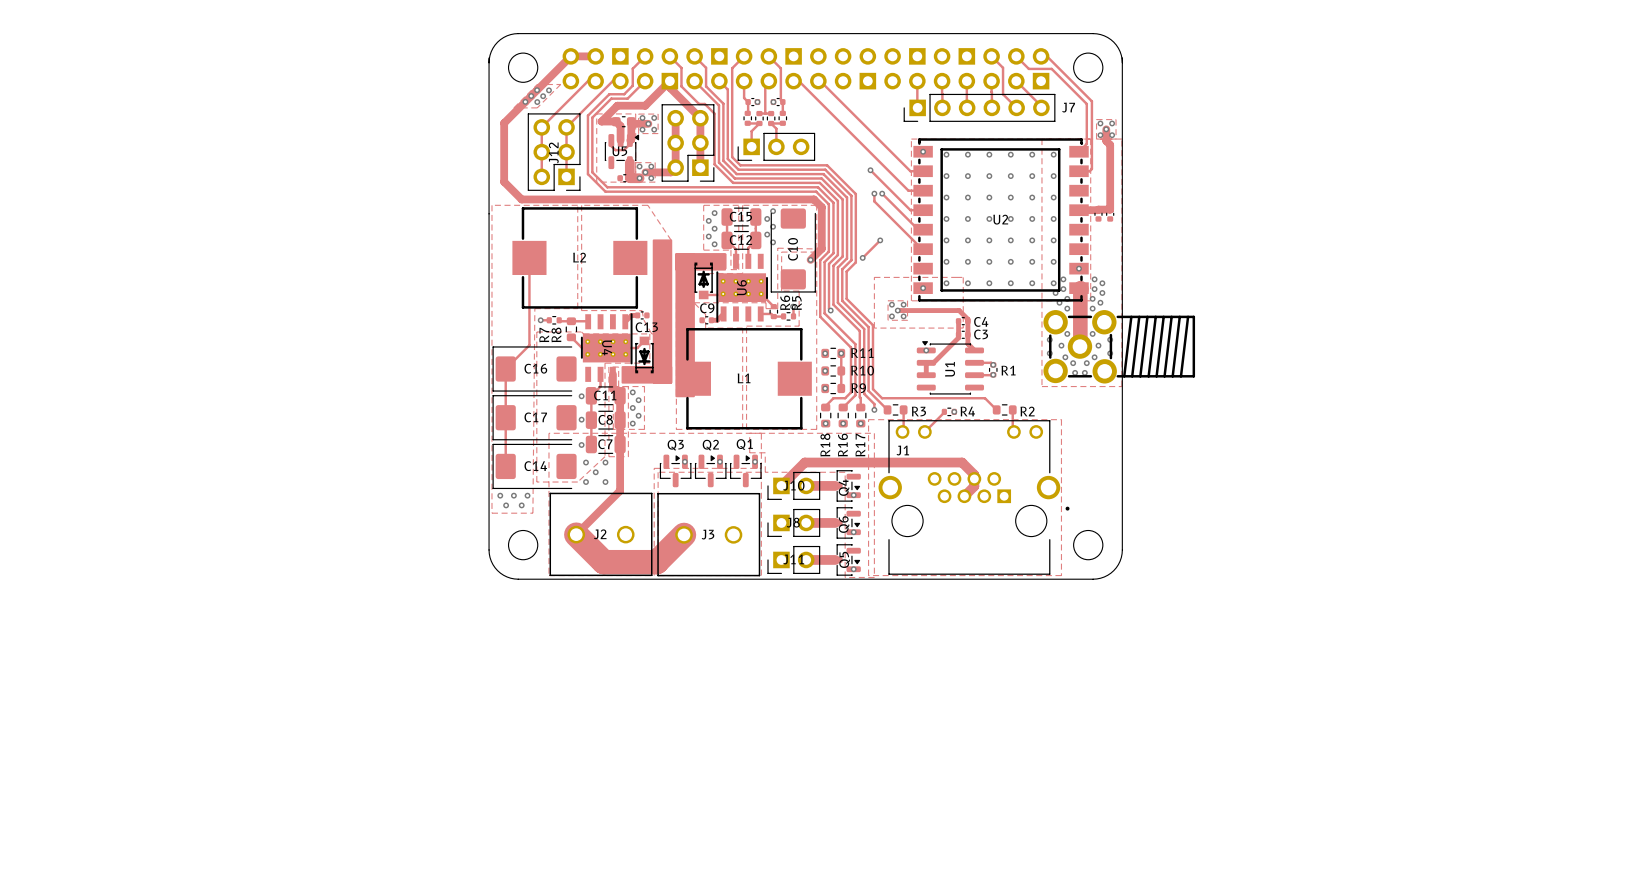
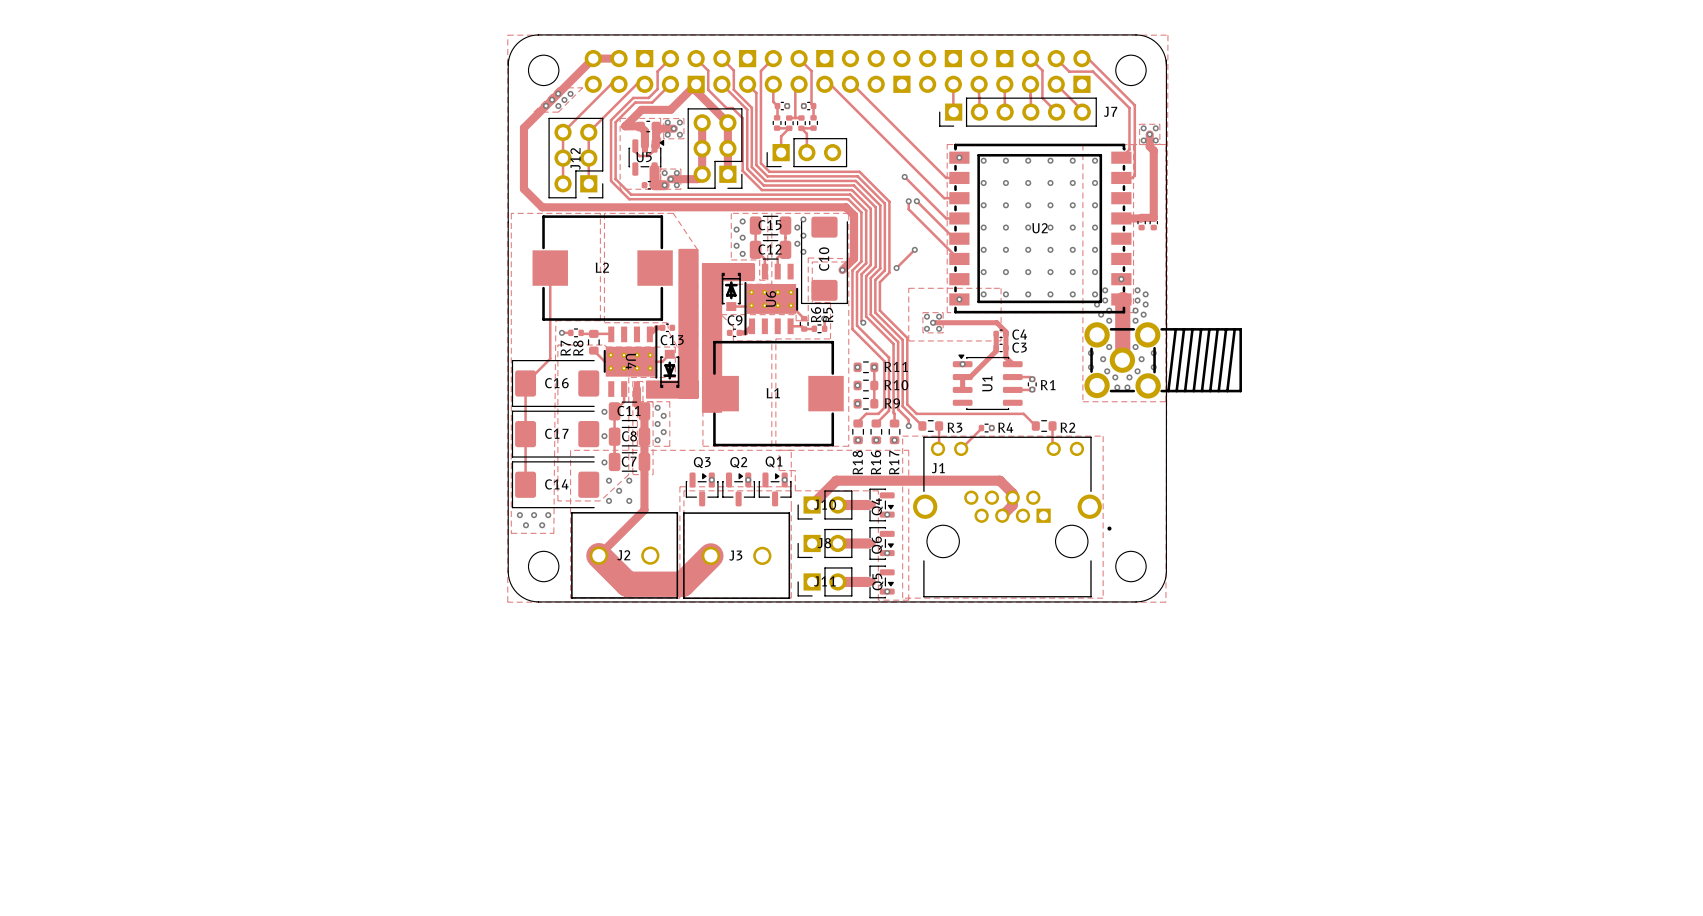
zone outline: none -> (507, 35) (1167, 35) (1165, 602) (507, 602) (507, 35)

